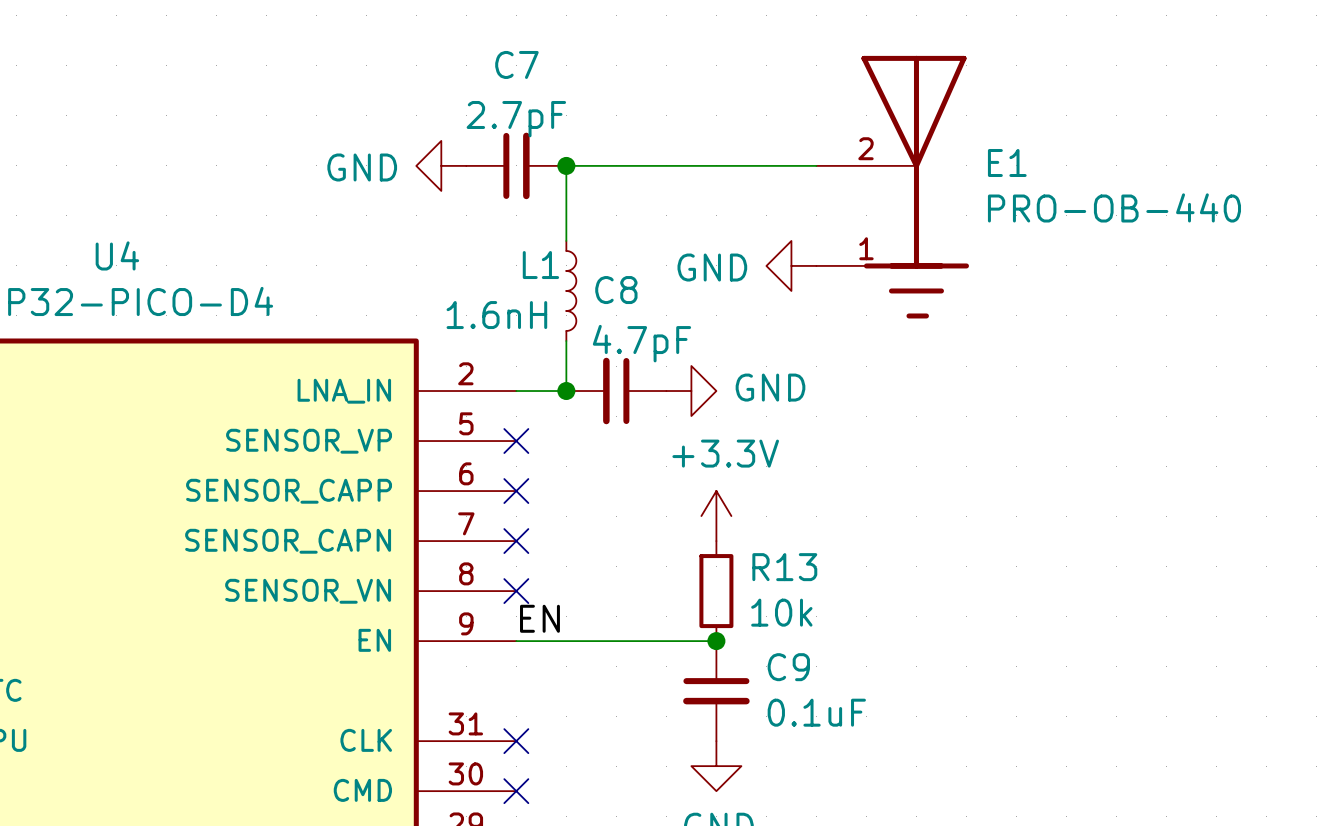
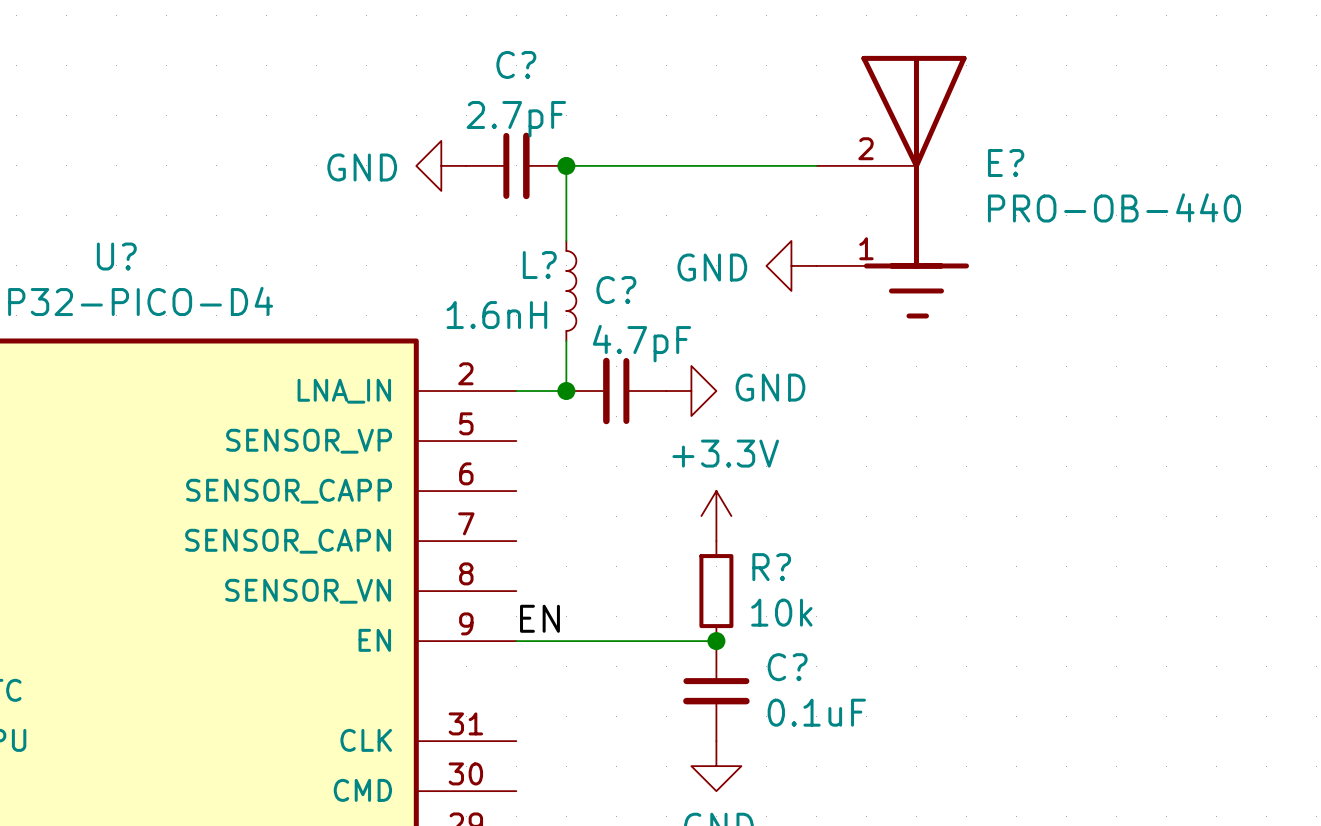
C7 name: C7 (516, 64) -> C? (516, 64)
E1 name: E1 (1007, 162) -> E? (1006, 162)
U4 name: U4 (117, 255) -> U? (116, 256)
L1 name: L1 (540, 265) -> L? (539, 265)
C8 name: C8 (616, 290) -> C? (616, 290)
no-connect mark: (516, 441) -> none
no-connect mark: (516, 491) -> none
no-connect mark: (516, 541) -> none
R13 name: R13 (784, 567) -> R? (771, 567)
no-connect mark: (516, 591) -> none
C9 name: C9 (788, 667) -> C? (787, 667)
no-connect mark: (516, 741) -> none
no-connect mark: (516, 791) -> none

